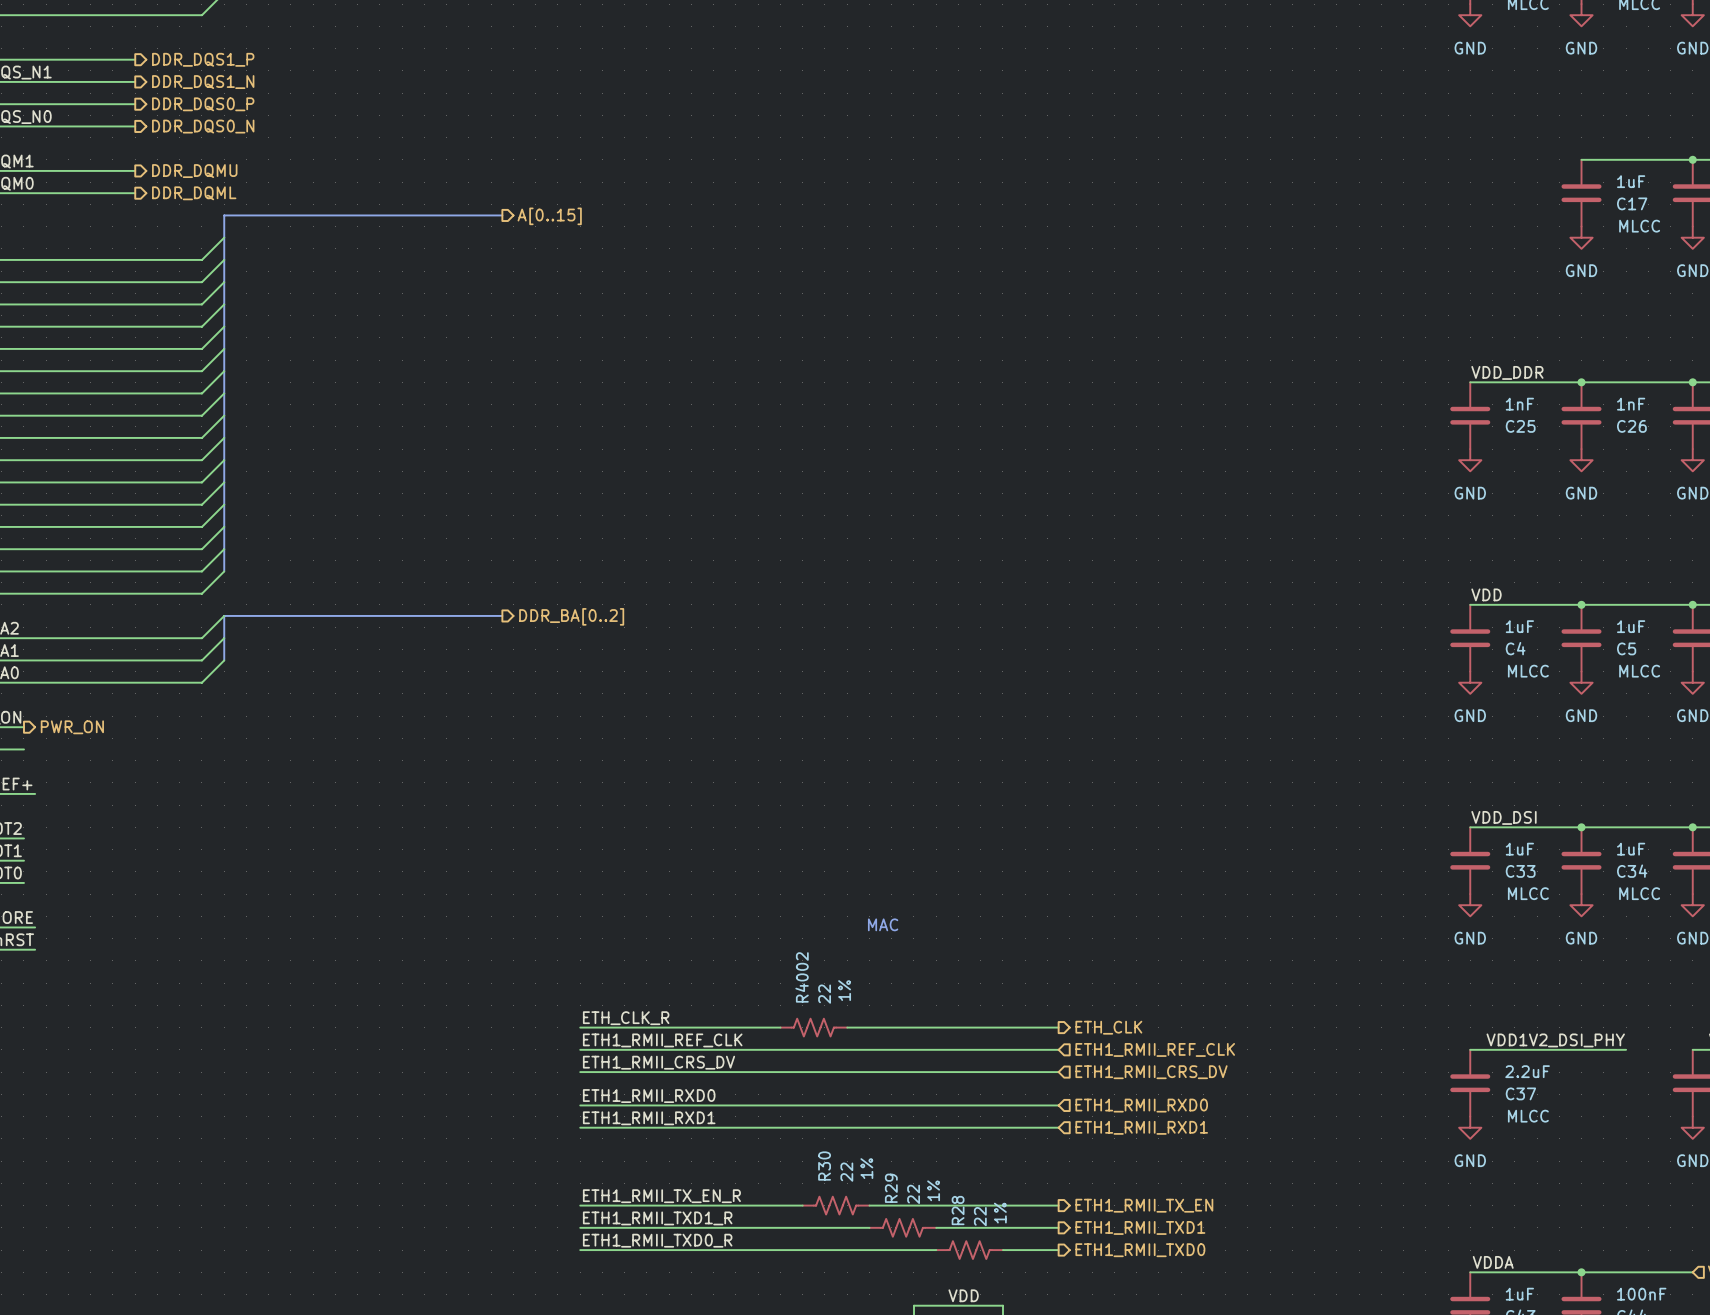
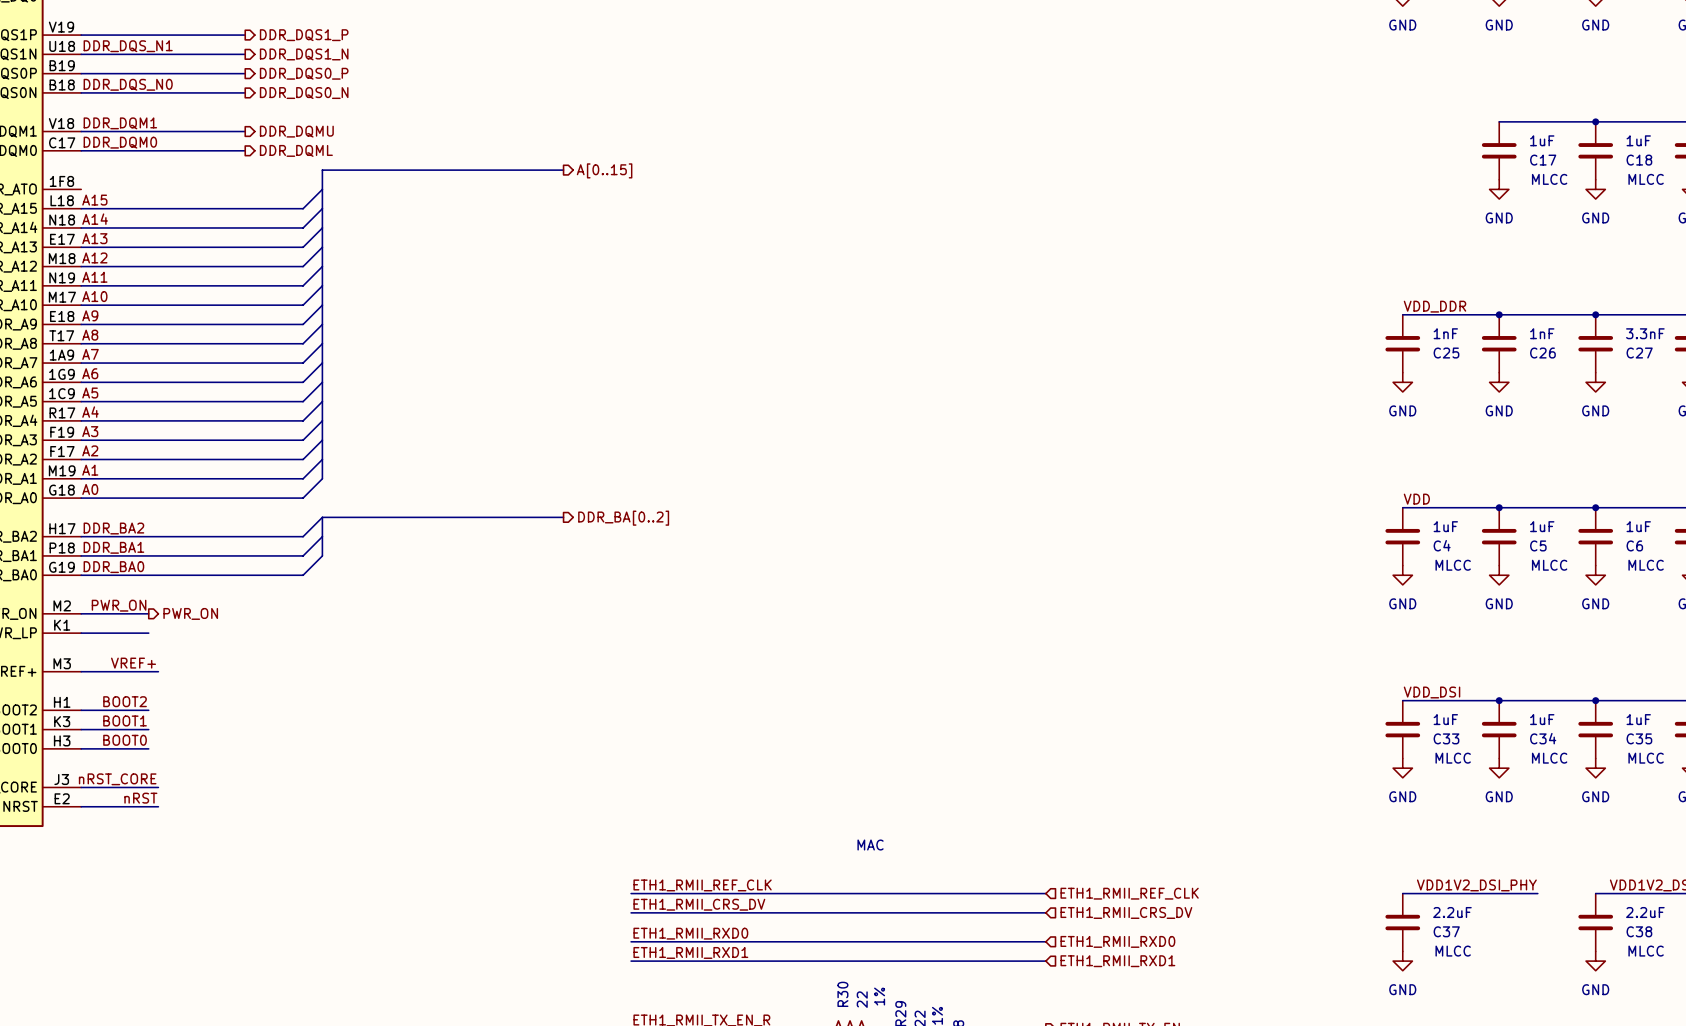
text position: MAC (883, 924) -> MAC (870, 845)
label: ETH_CLK_R (626, 1018) -> none
wire: (580, 1027) (780, 1027) -> none
R4002: 22 (813, 1027) -> none
wire: (847, 1027) (1058, 1027) -> none
hierarchical label: ETH_CLK (1108, 1027) -> none

